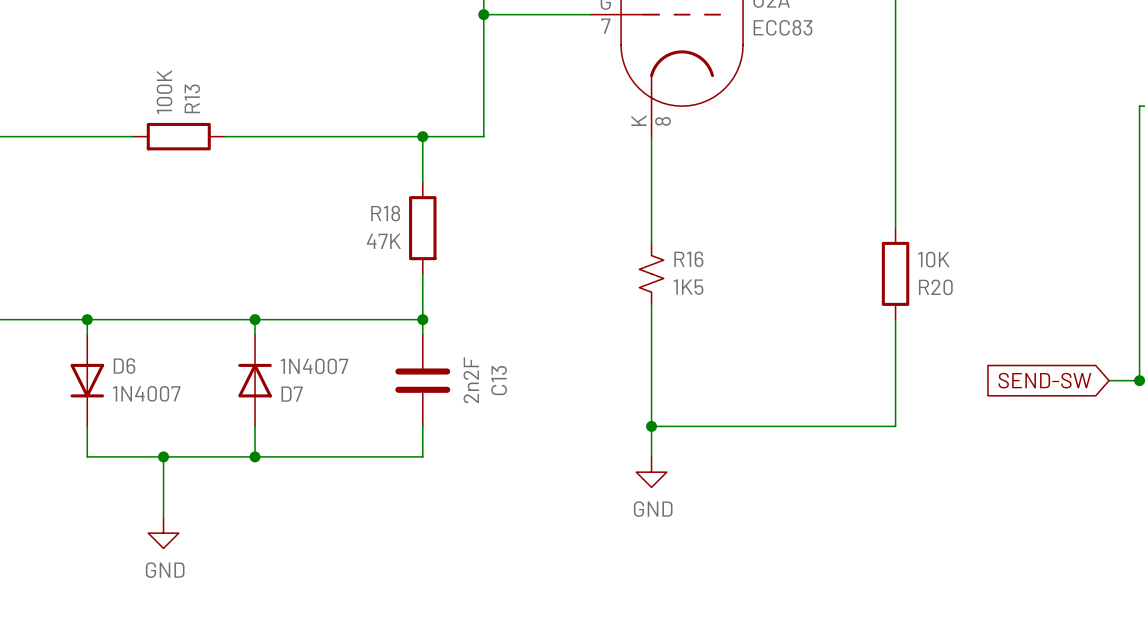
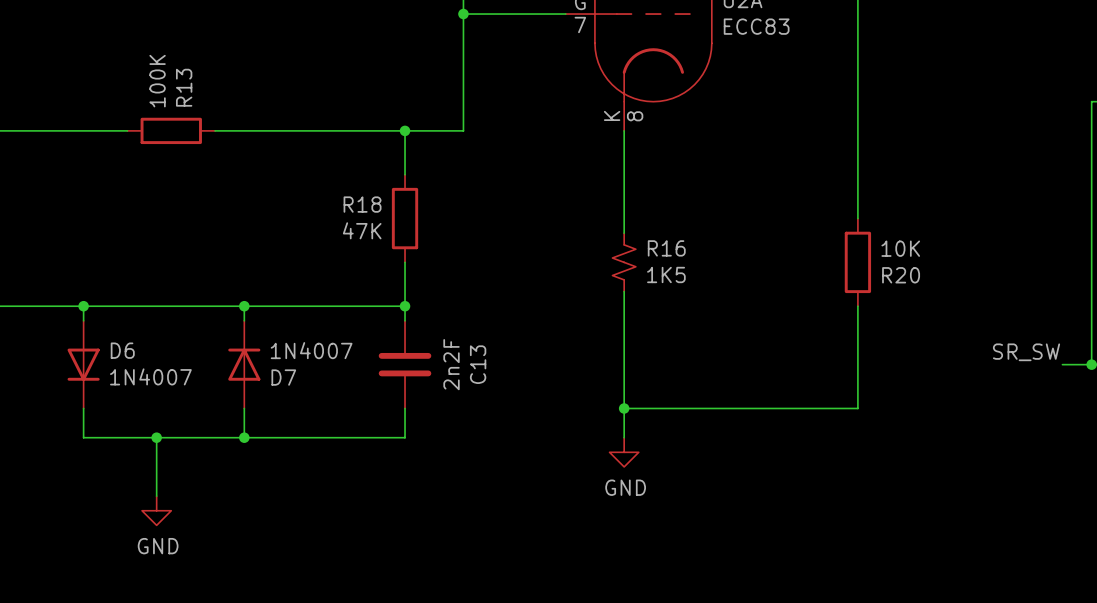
label: none -> SR_SW (1026, 352)
global label: SEND-SW (1044, 380) -> none

